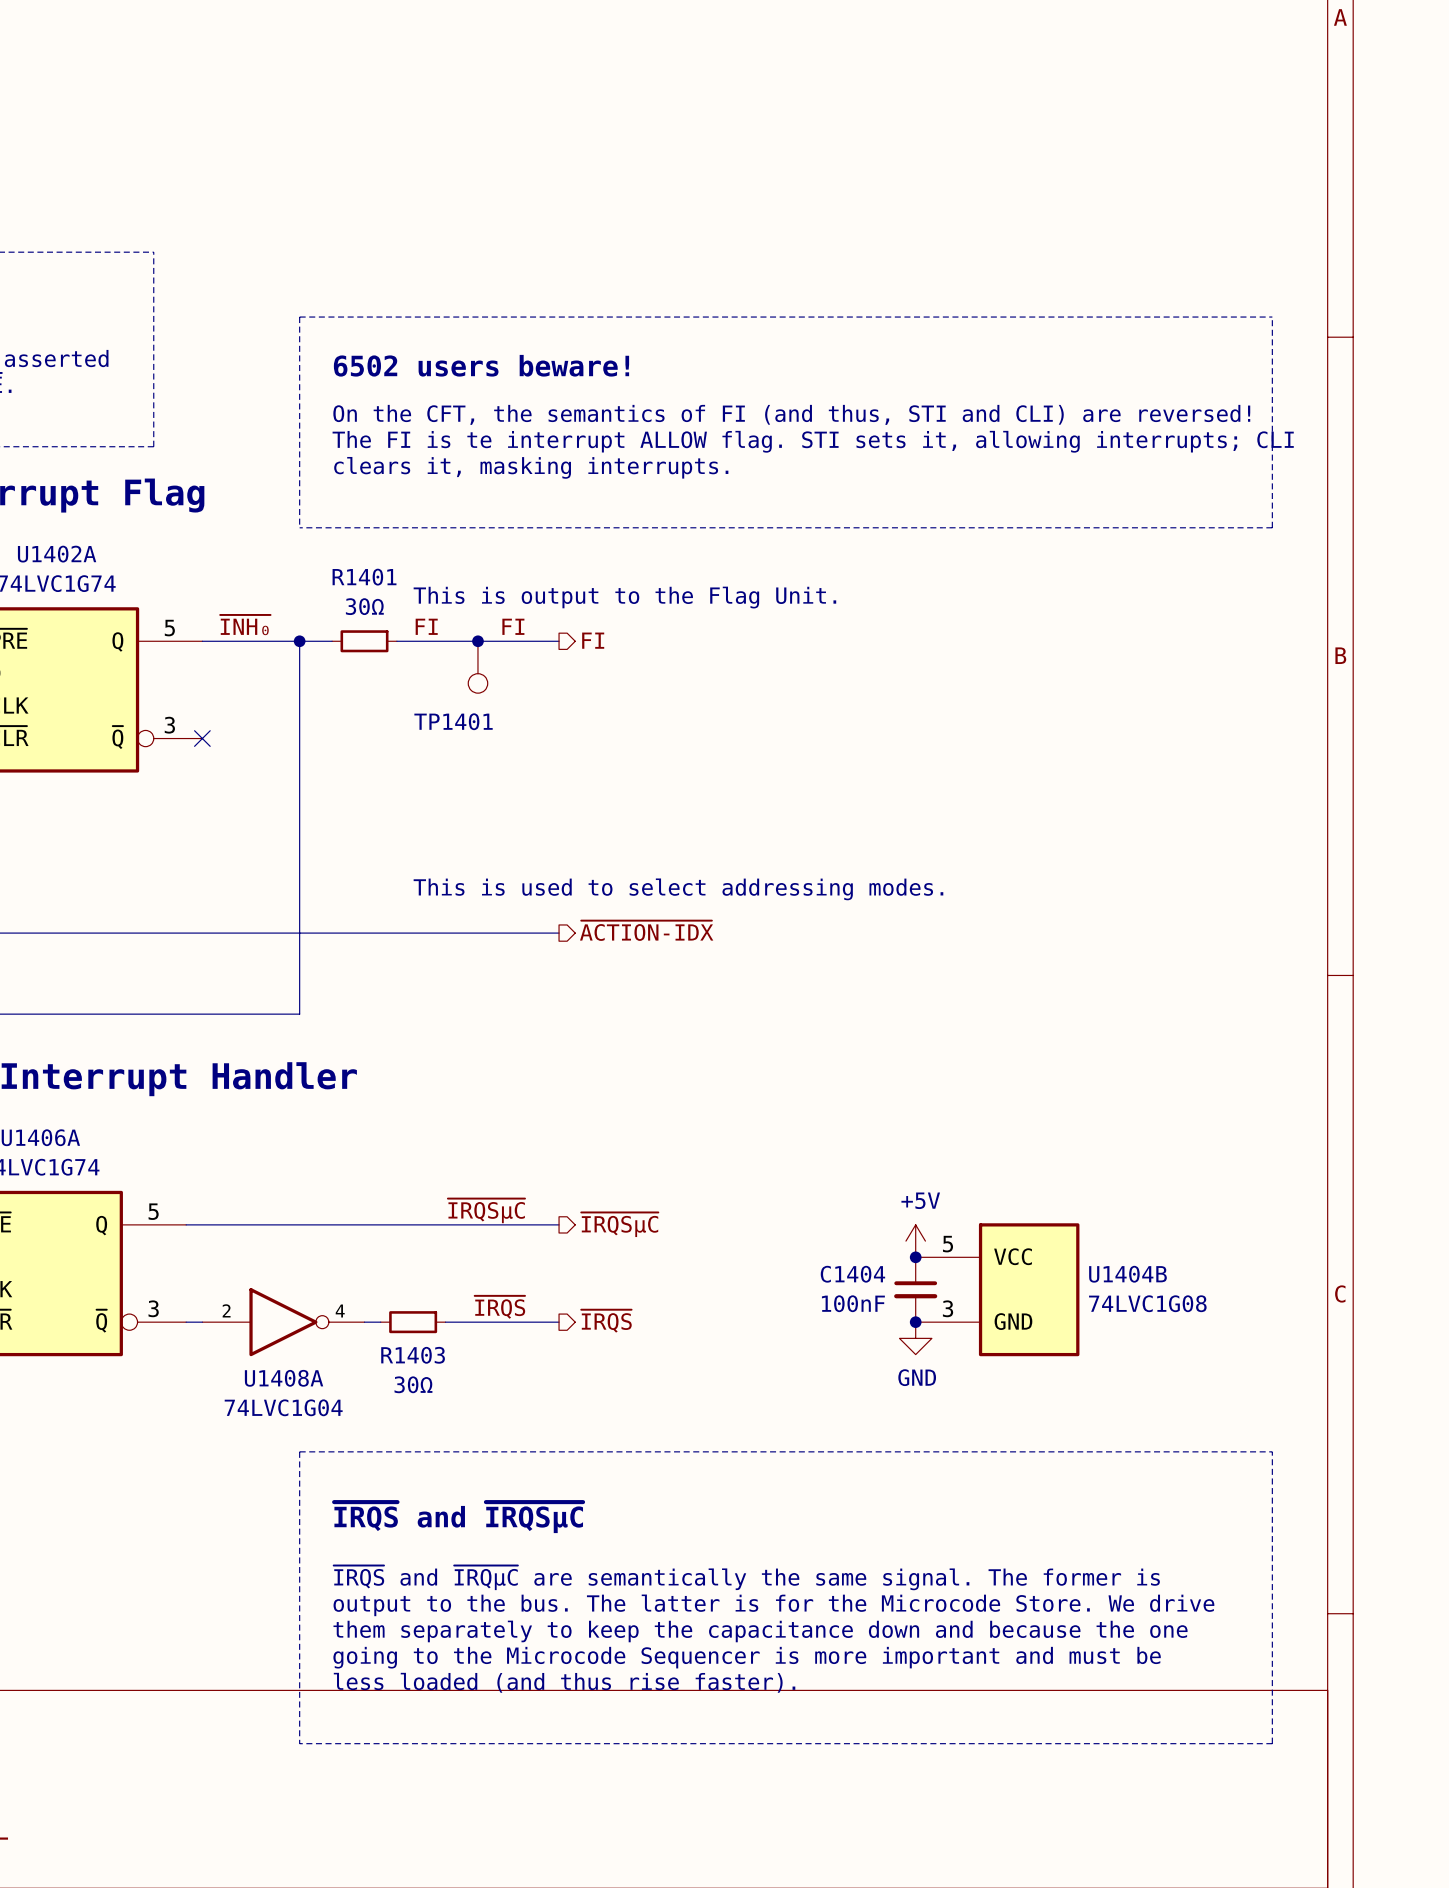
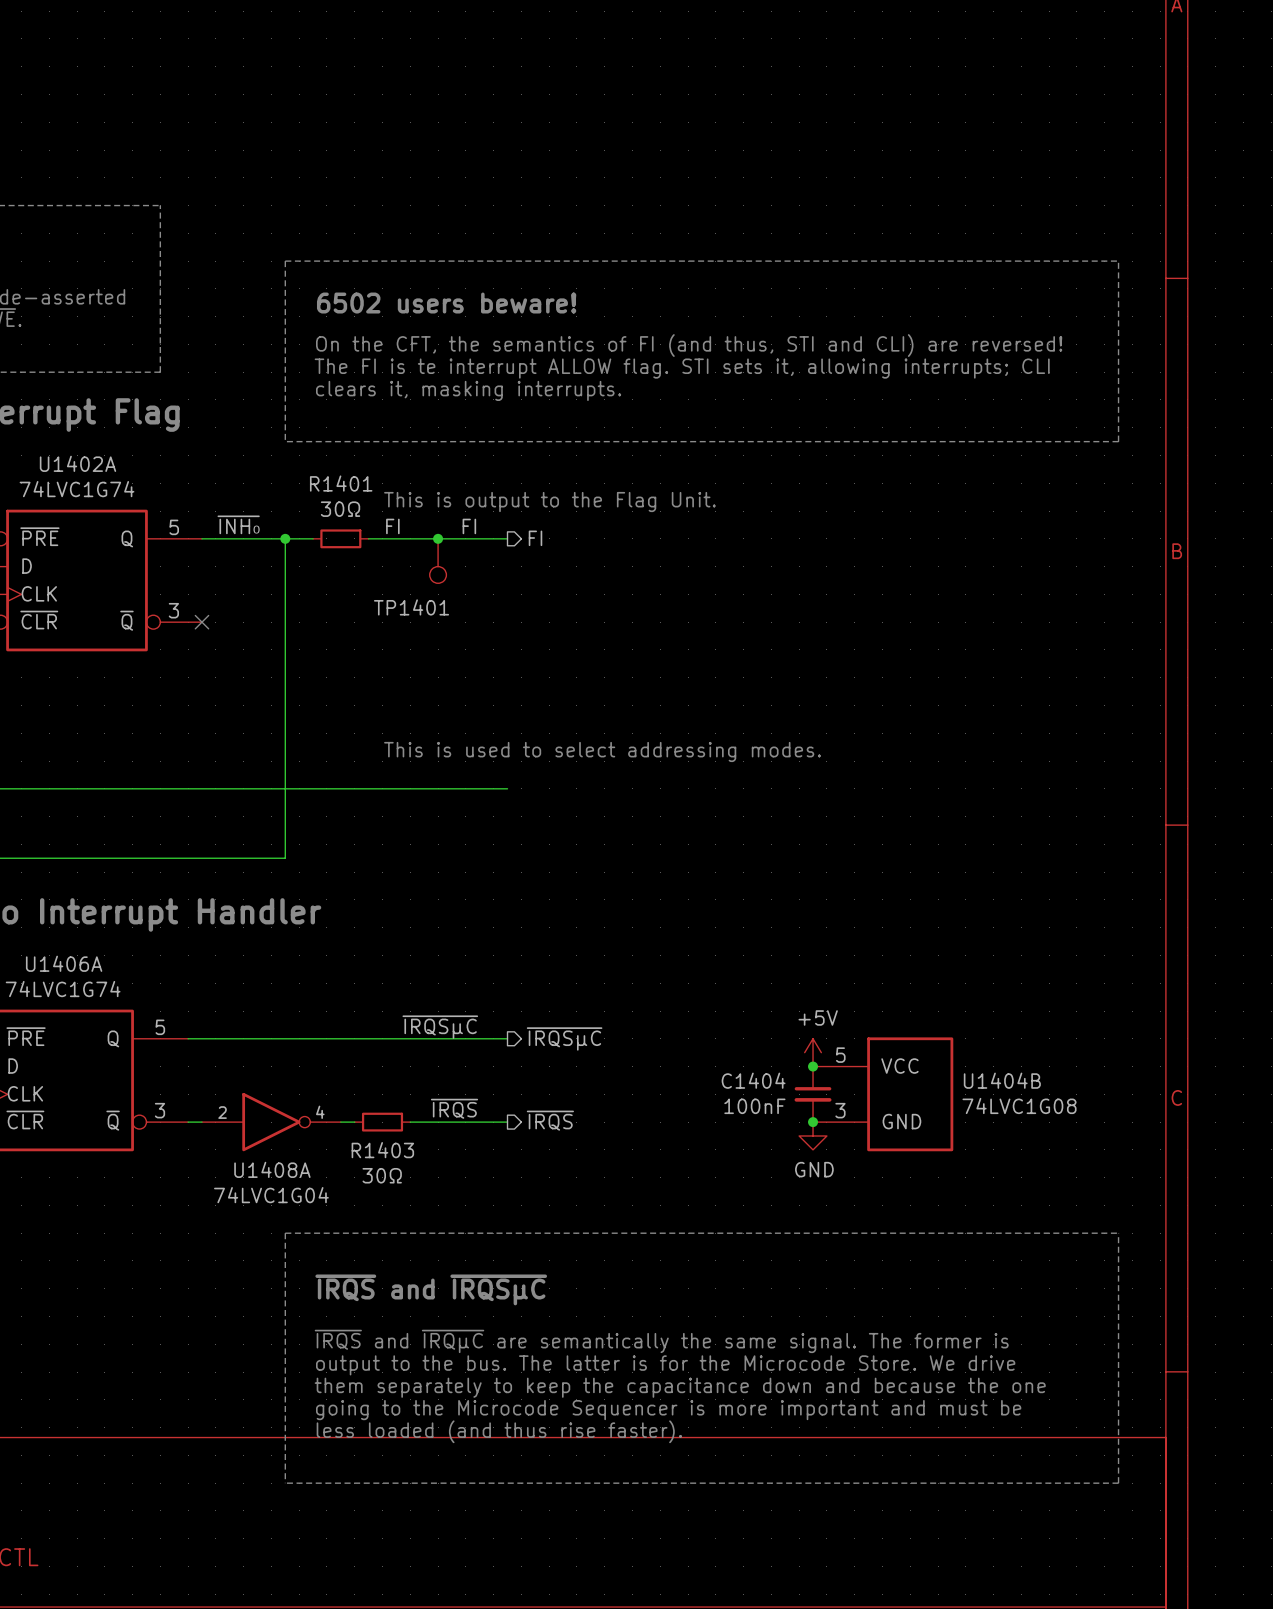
hierarchical label: ~{ACTION-IDX} (646, 930) -> none

